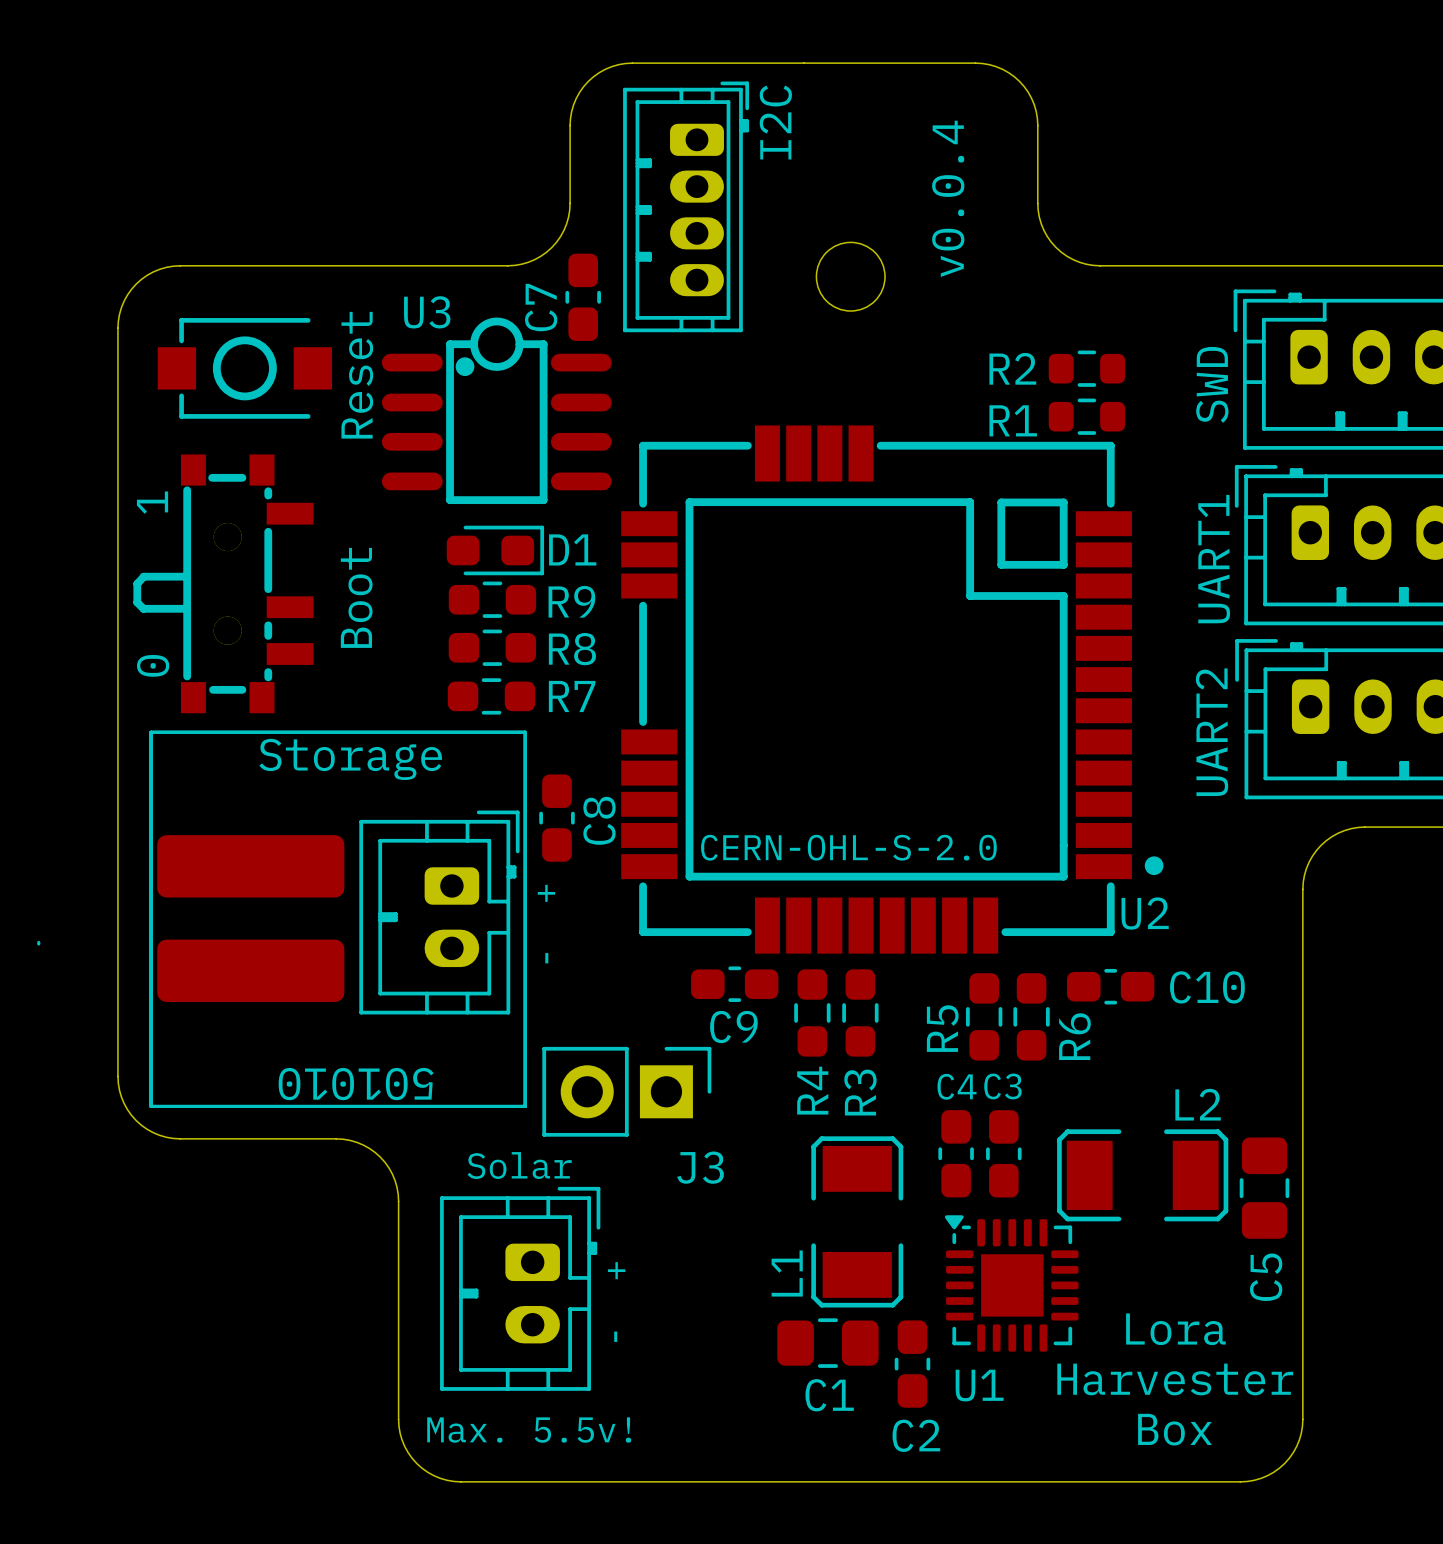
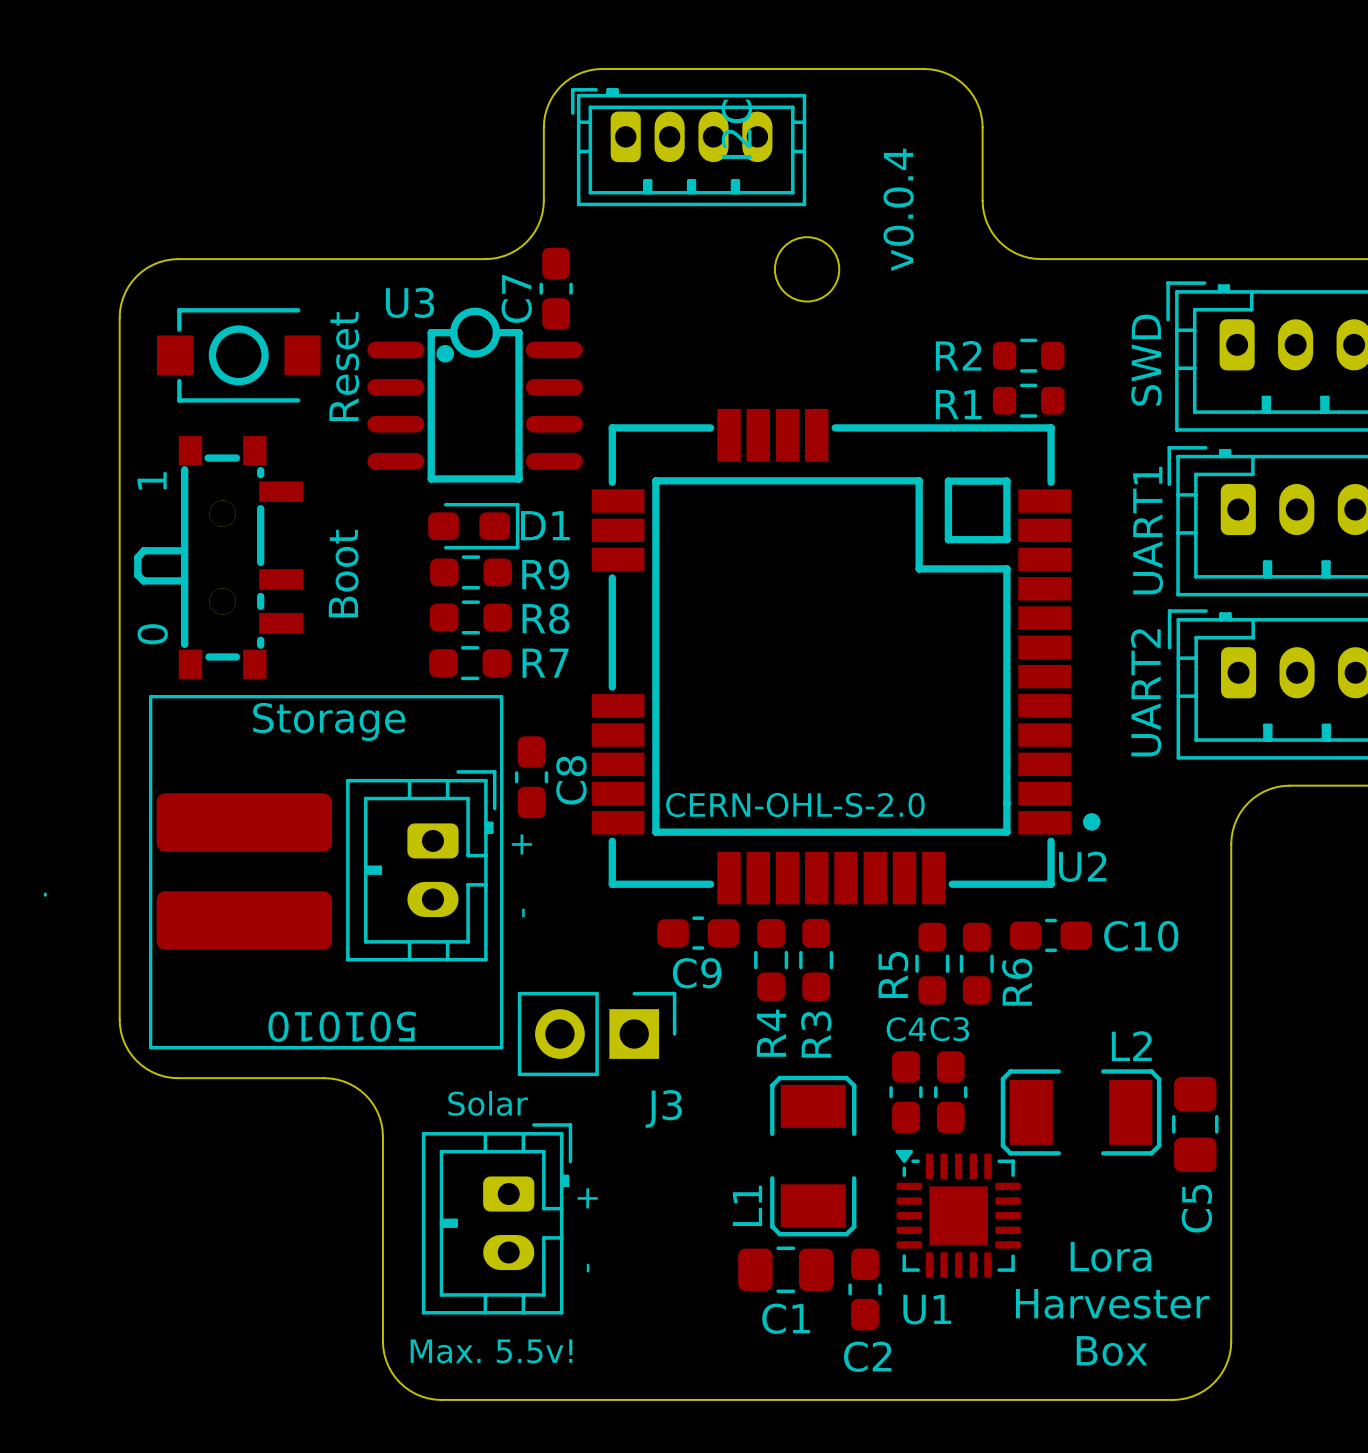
part rotation: 0° (686, 206) -> 90° counterclockwise (688, 147)

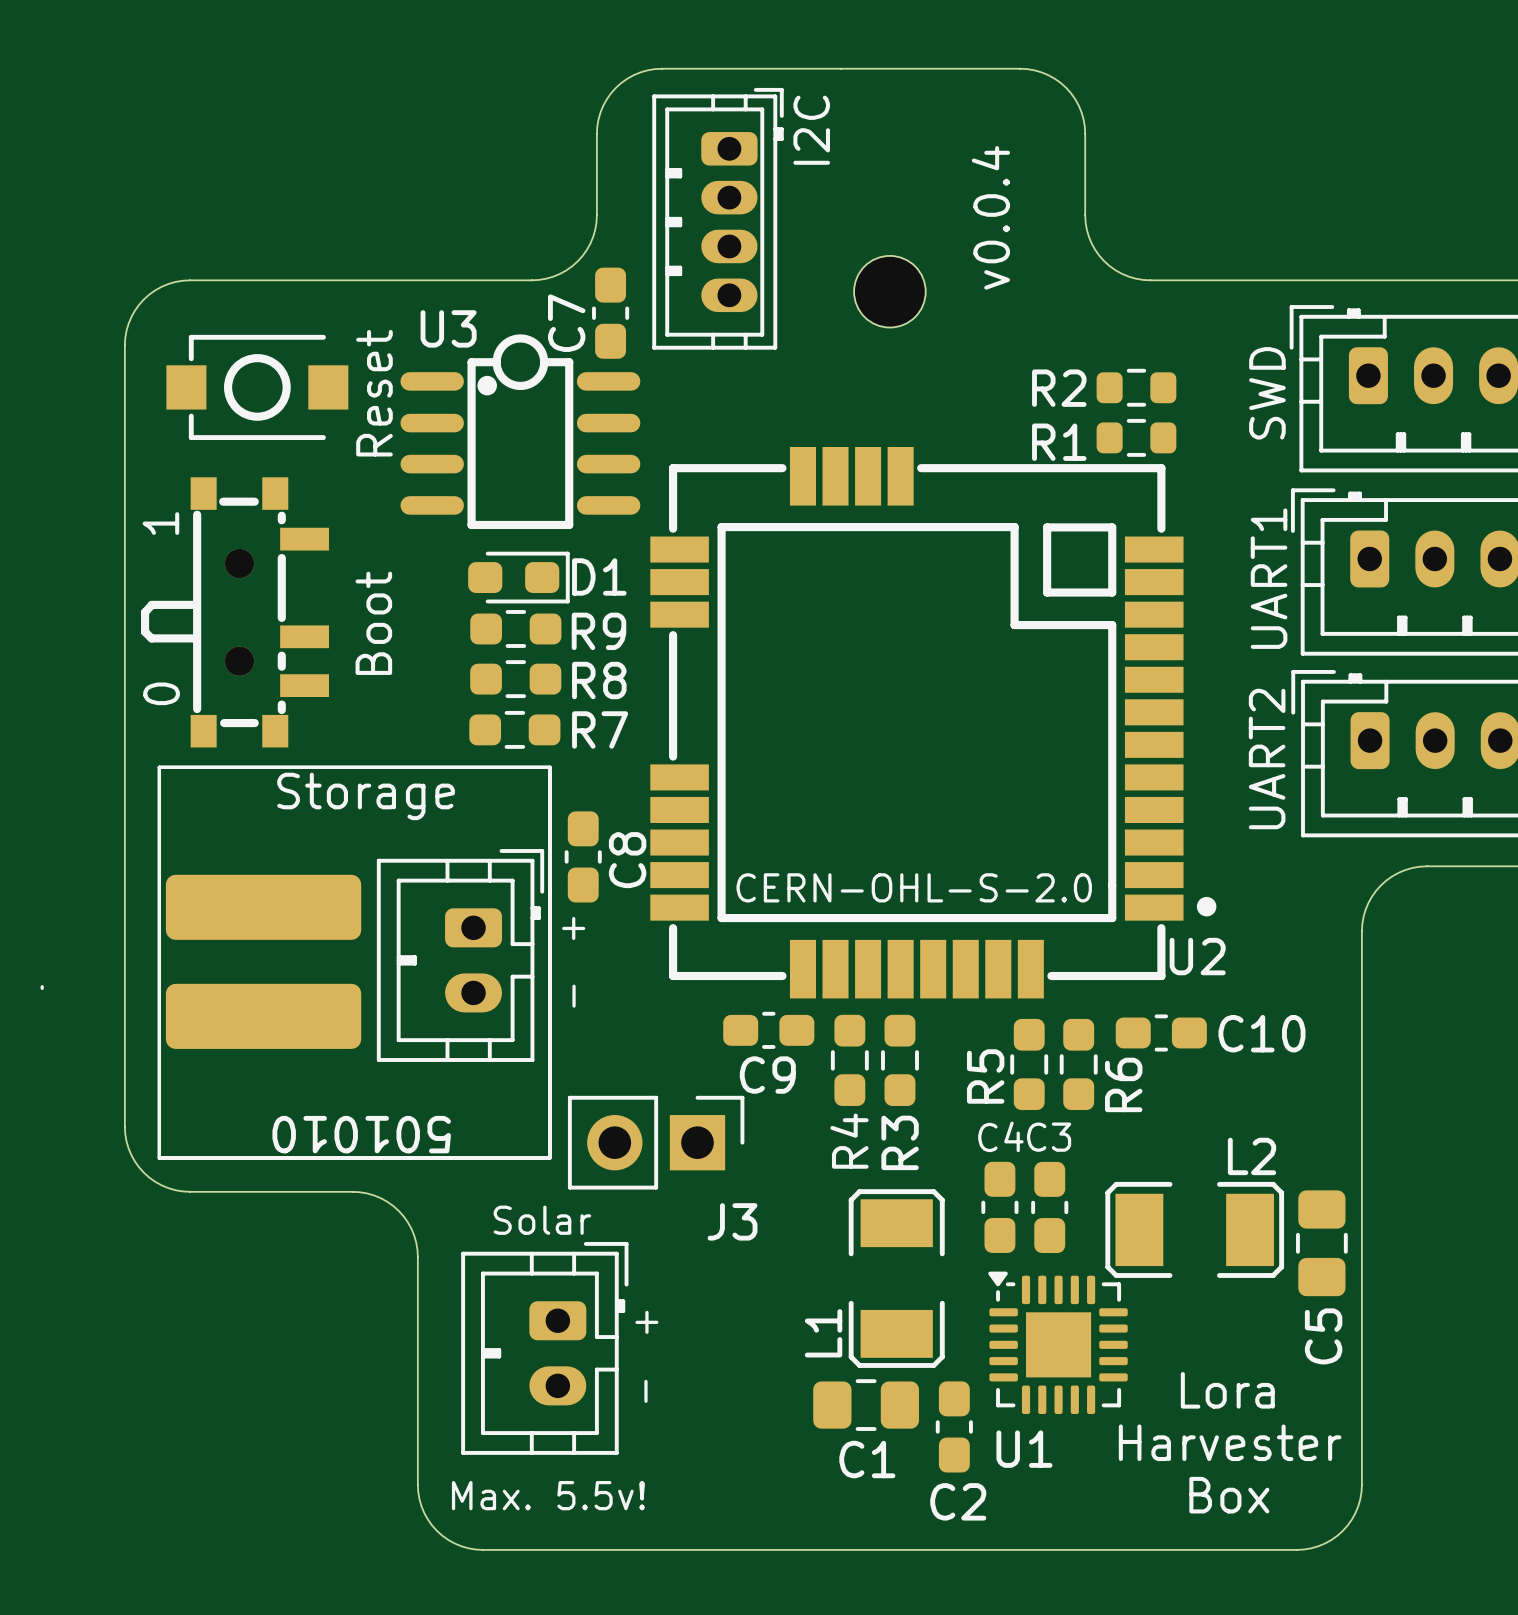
part rotation: 0° (688, 147) -> 90° clockwise (718, 218)

